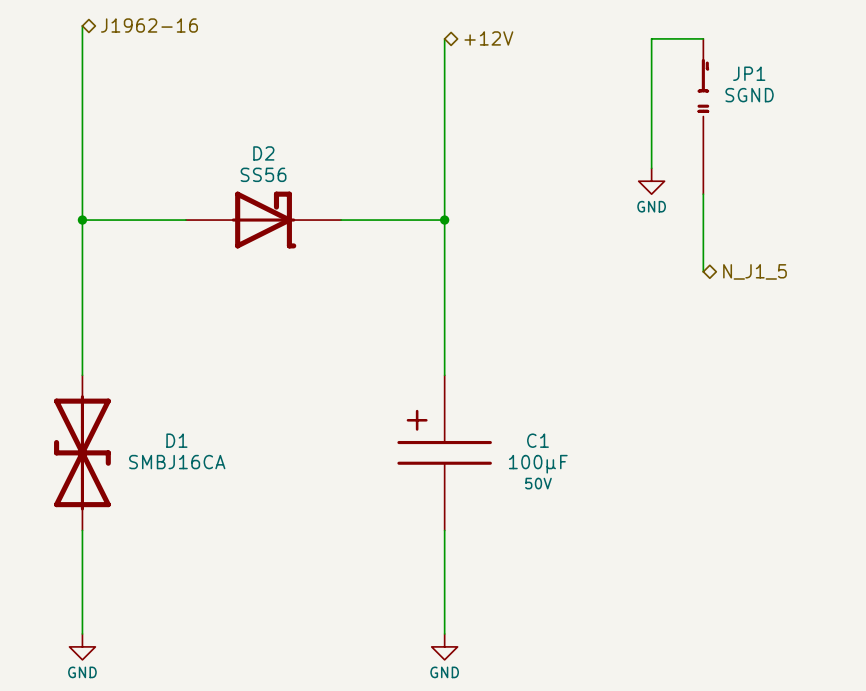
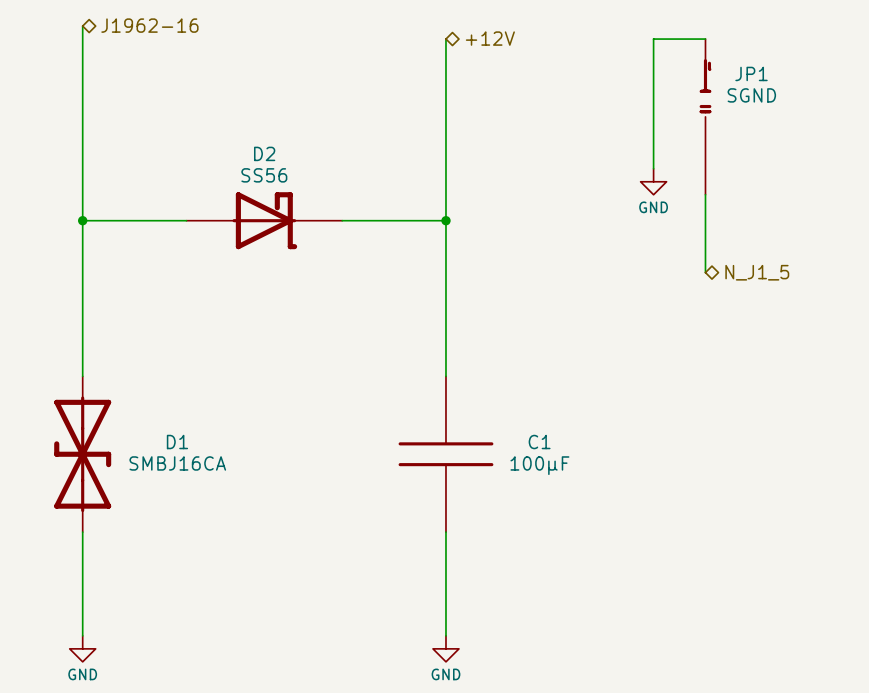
C1 symbol: [397, 375, 492, 531] -> [398, 376, 494, 533]
C1 text: 50V (538, 483) -> none

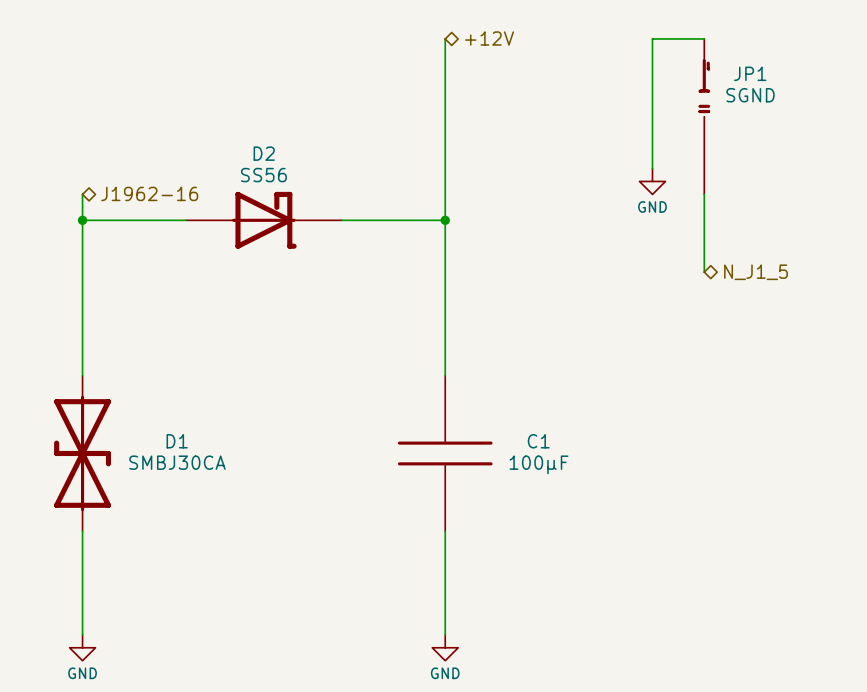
hierarchical label position: J1962-16 (149, 25) -> J1962-16 (149, 193)
wire: (82, 26) (82, 194) -> none
D1 value: SMBJ16CA (177, 463) -> SMBJ30CA (177, 462)

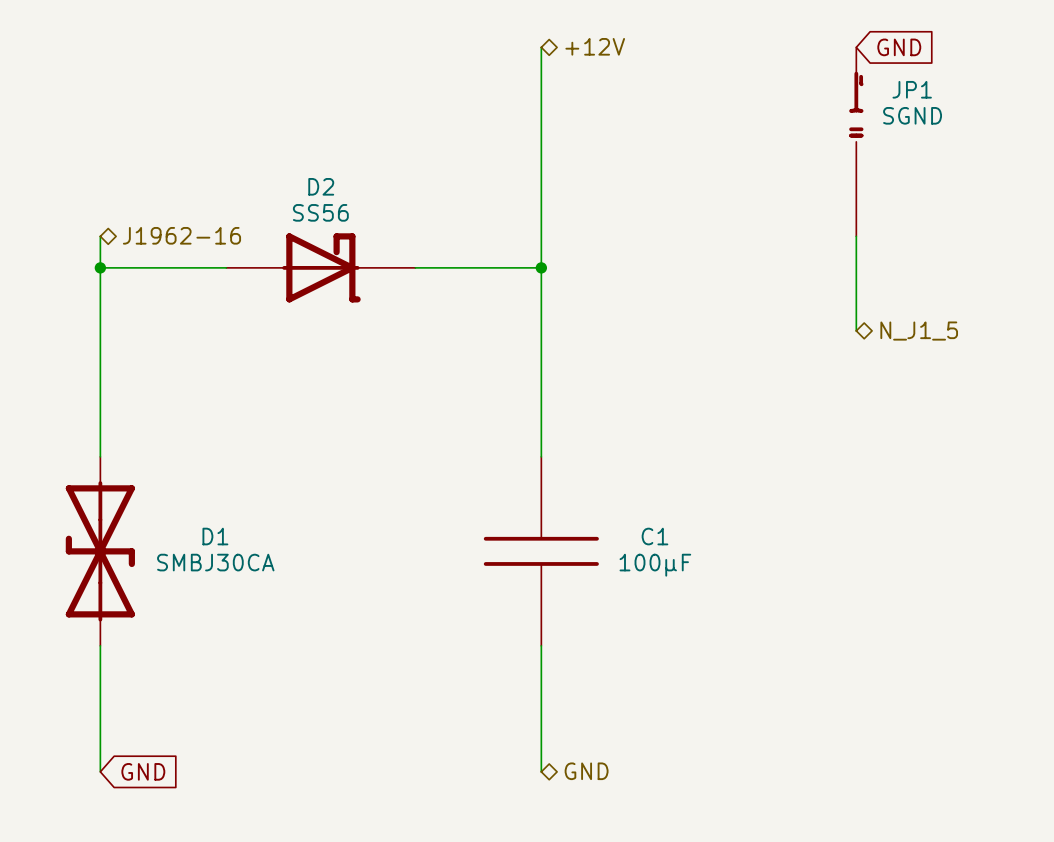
wire: (704, 38) (652, 38) (652, 168) -> none
global label: none -> GND (899, 47)
power symbol: GND (652, 181) -> none
global label: none -> GND (143, 771)
hierarchical label: none -> GND (586, 771)
power symbol: GND (82, 647) -> none
power symbol: GND (445, 647) -> none

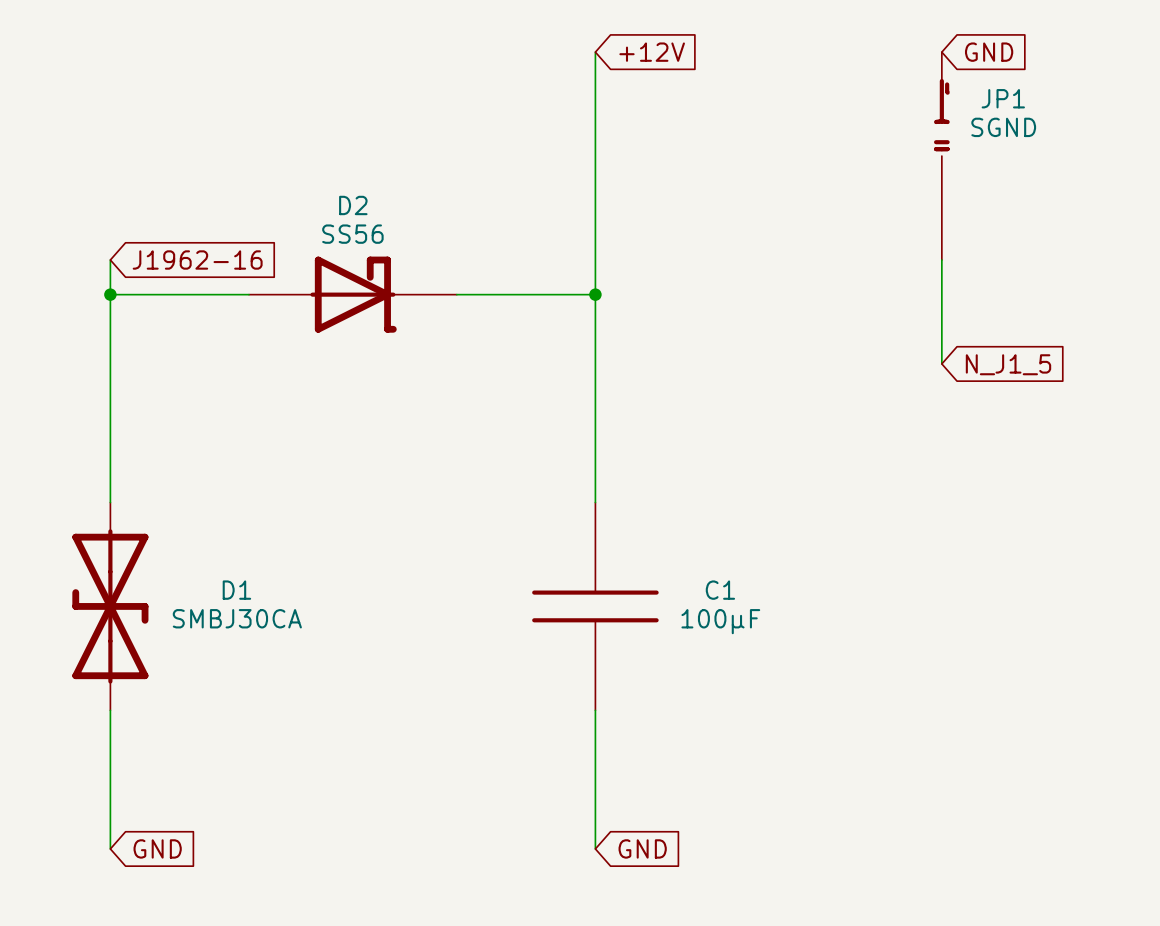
hierarchical label: +12V (595, 46) -> none
global label: none -> +12V (652, 52)
hierarchical label: J1962-16 (181, 235) -> none
global label: none -> J1962-16 (197, 260)
global label: none -> N_J1_5 (1008, 364)
hierarchical label: N_J1_5 (919, 331) -> none
global label: none -> GND (642, 848)
hierarchical label: GND (586, 771) -> none

